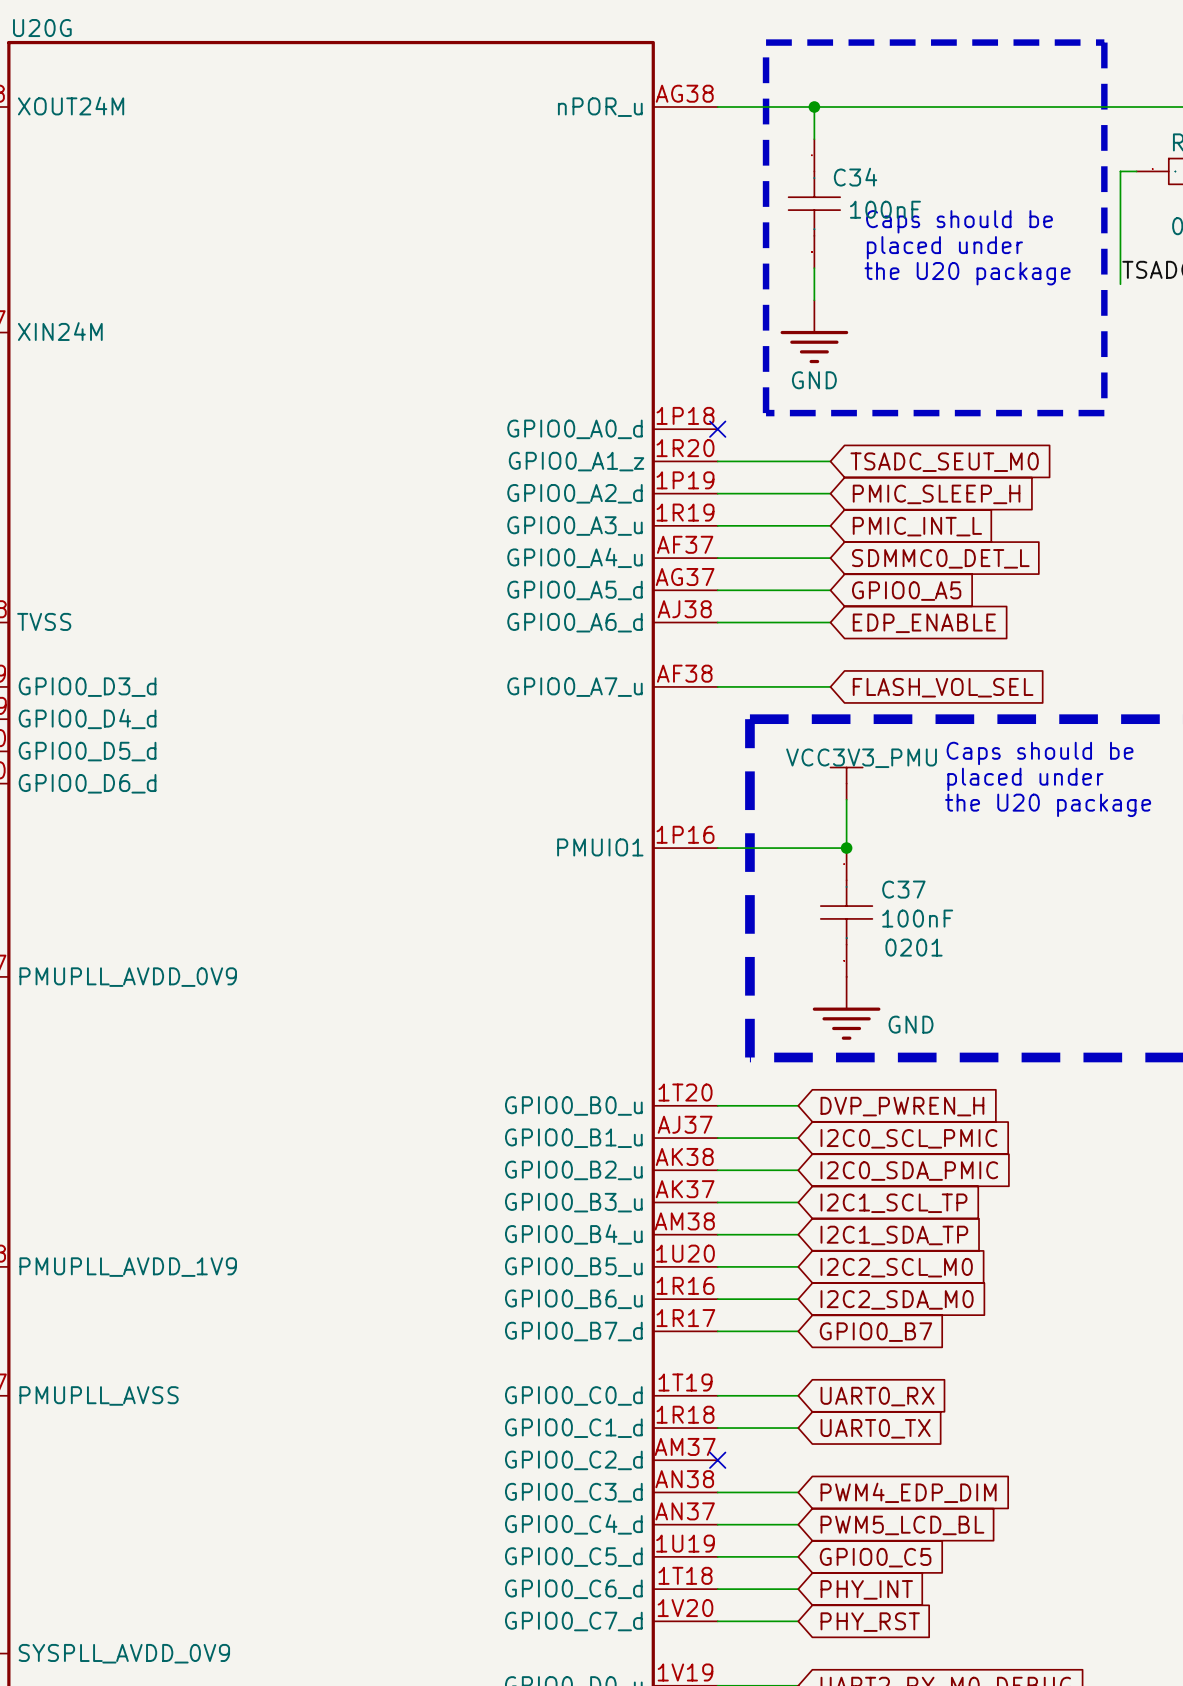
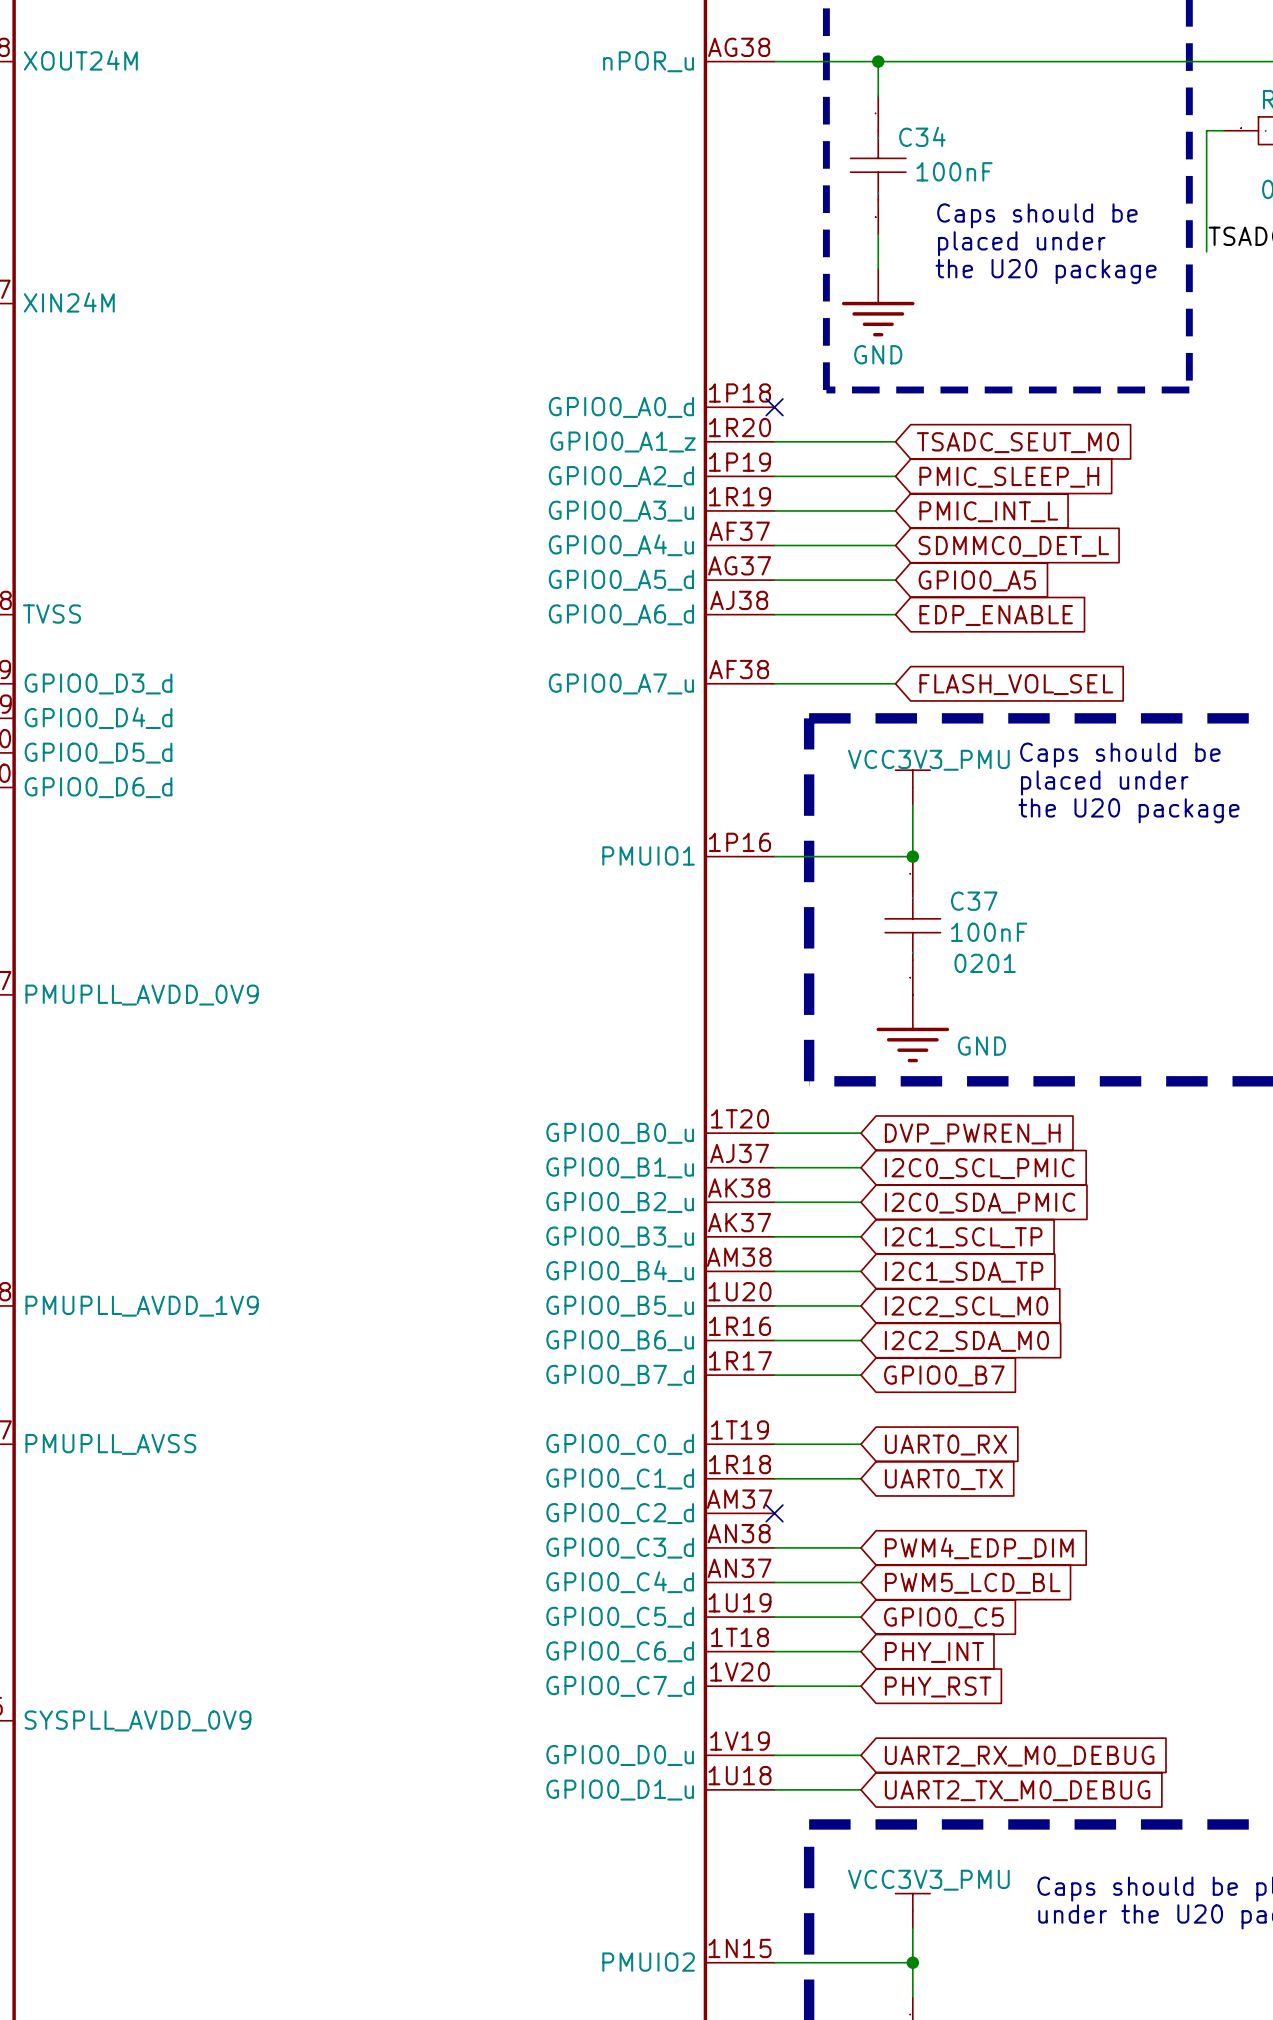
text: Caps should be (959, 221) -> none
text: placed under (944, 247) -> Caps should be (1037, 215)
text: the U20 package (967, 273) -> placed under (1021, 243)
text: none -> the U20 package (1046, 271)

